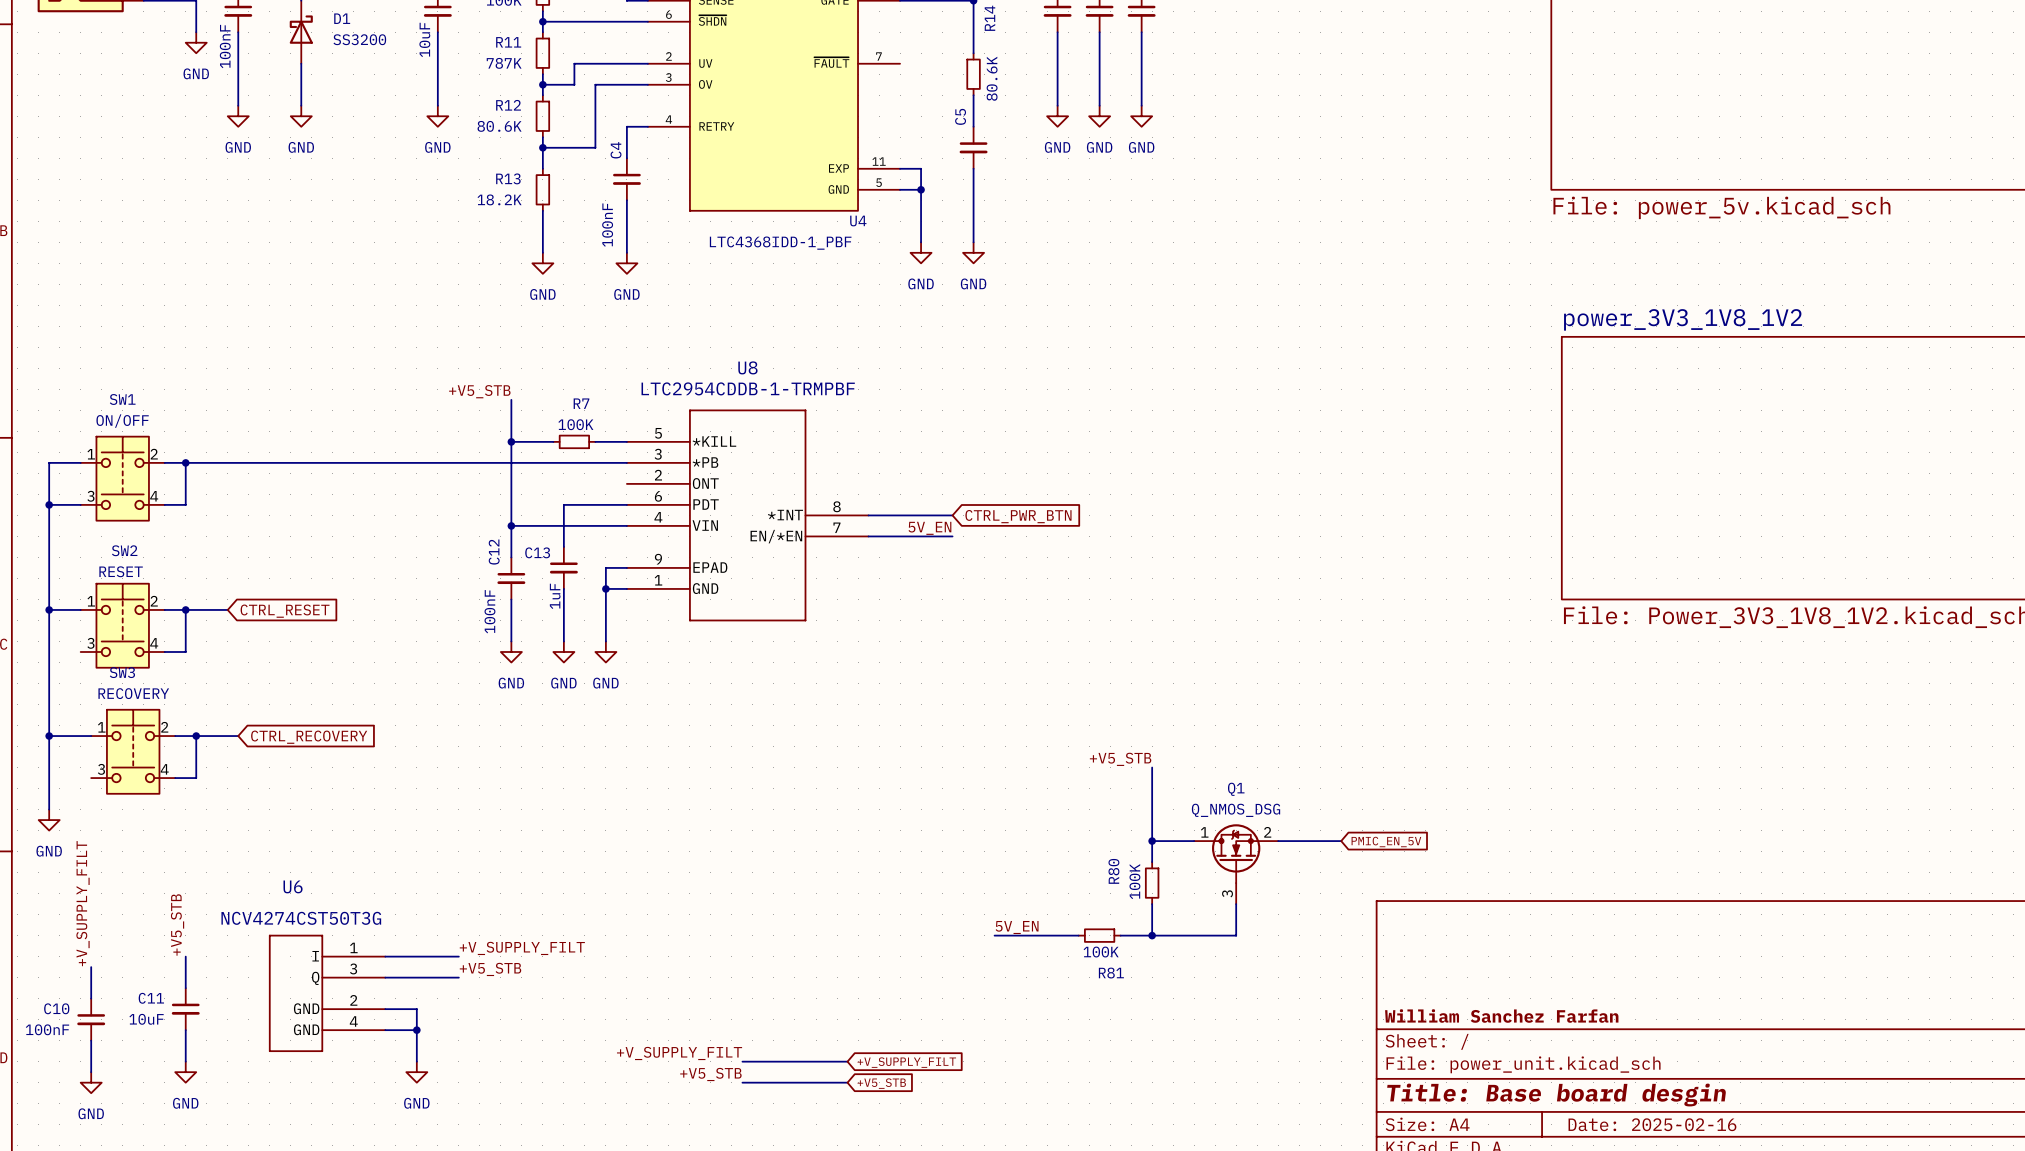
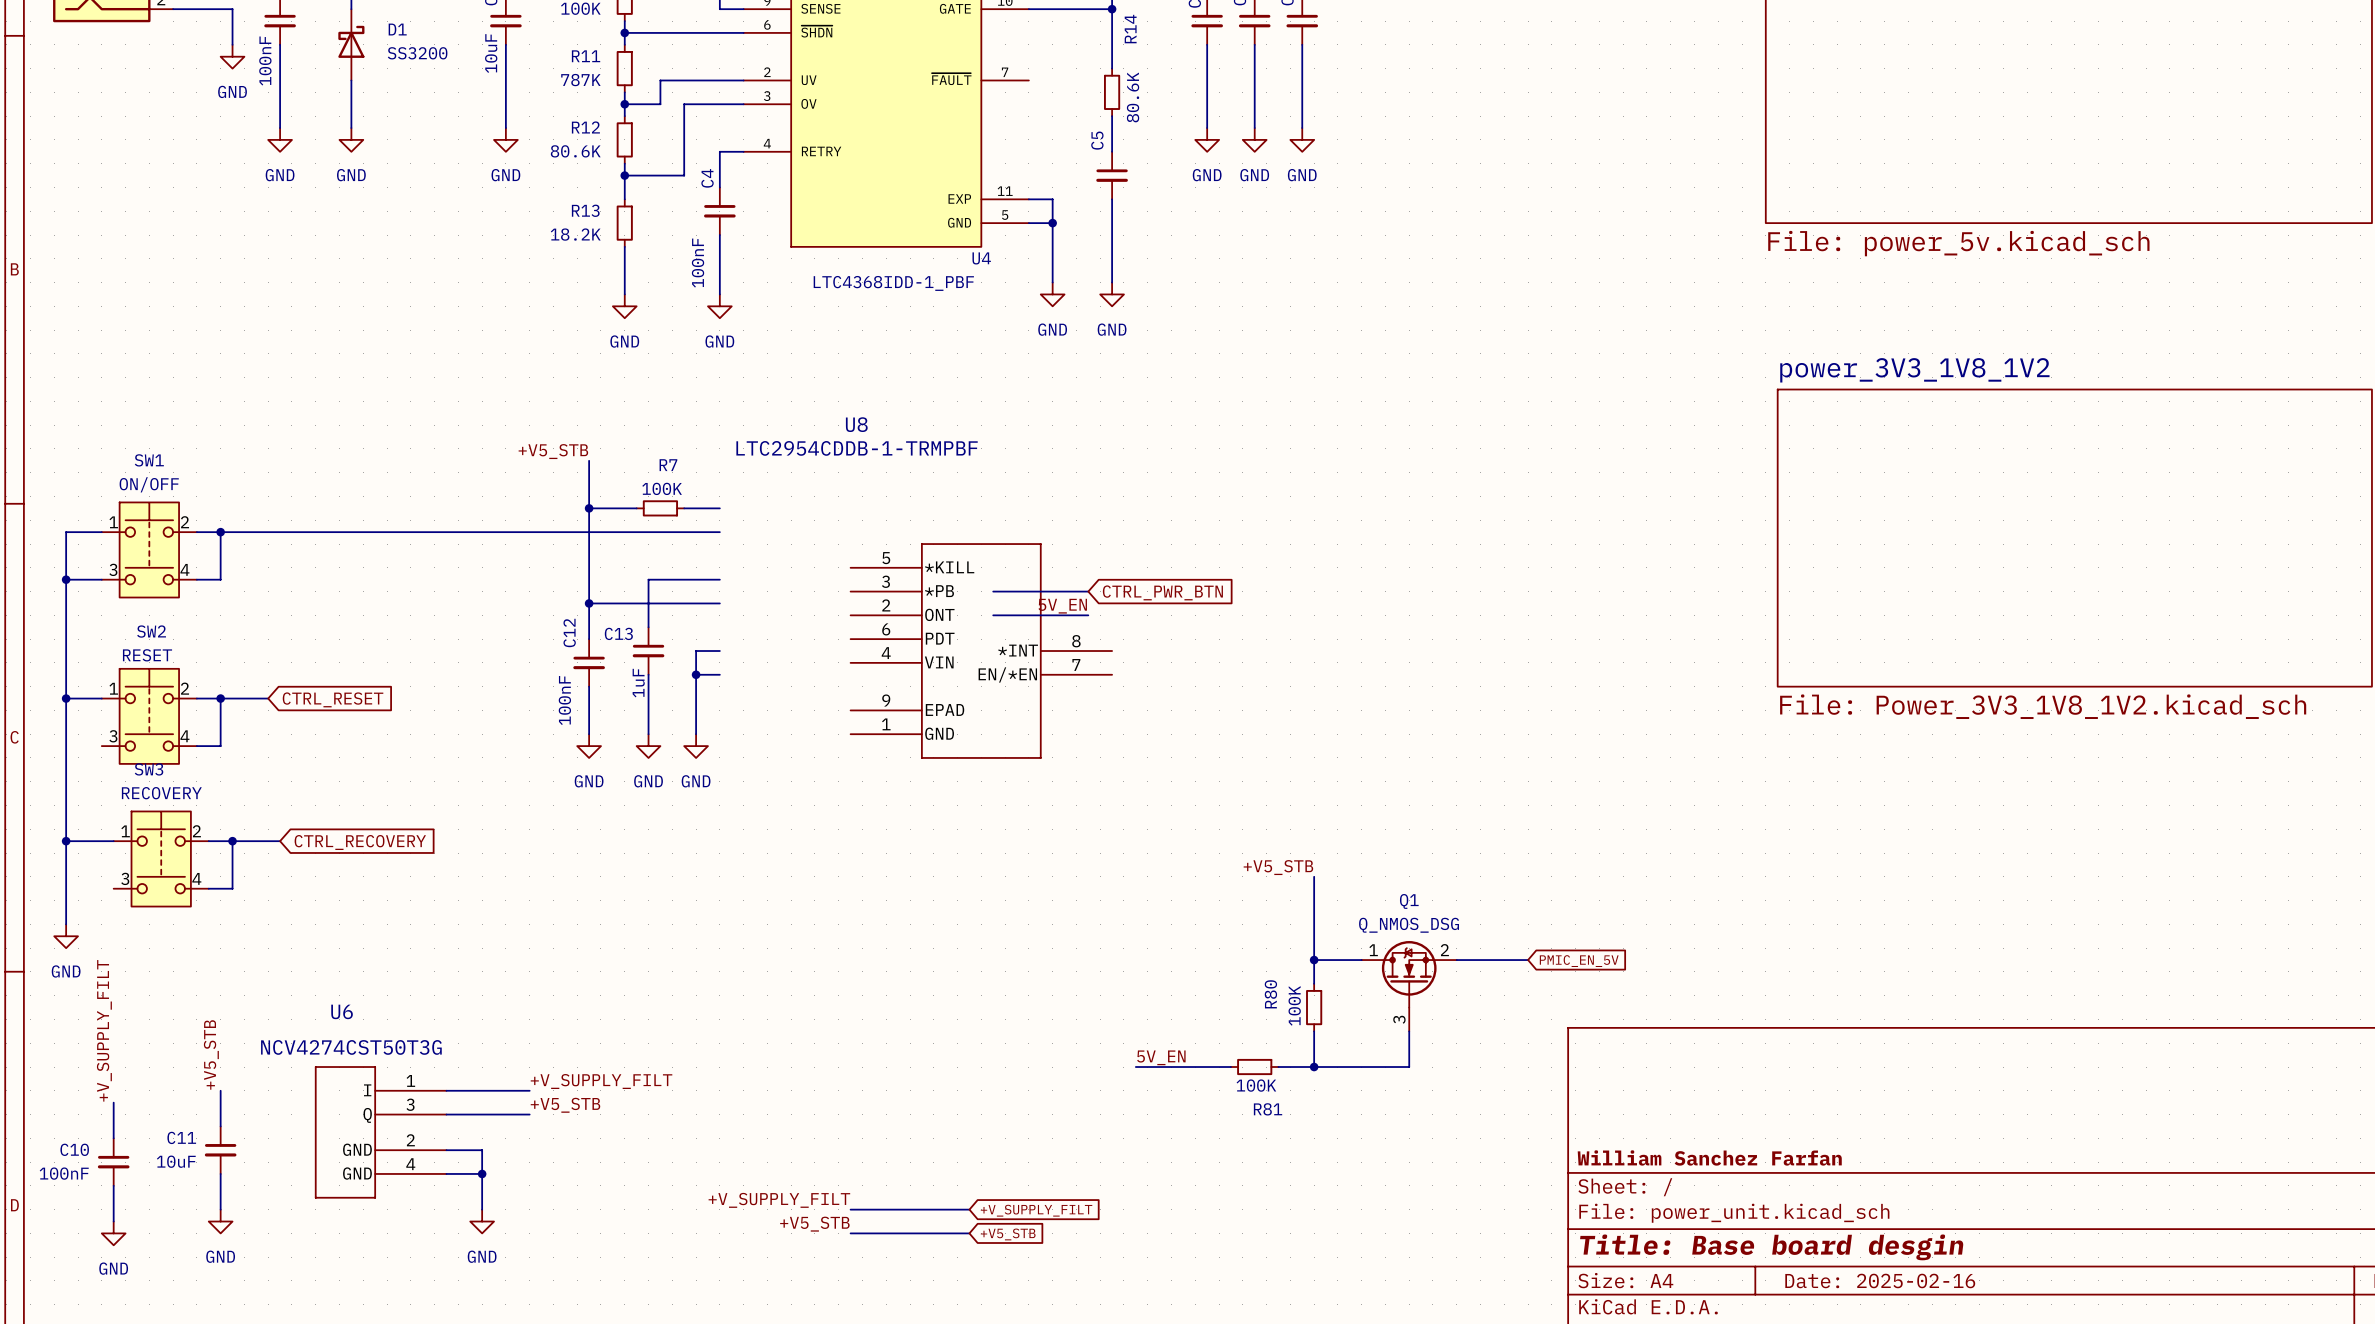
U8 symbol: [626, 409, 869, 622] -> [850, 543, 1113, 759]

